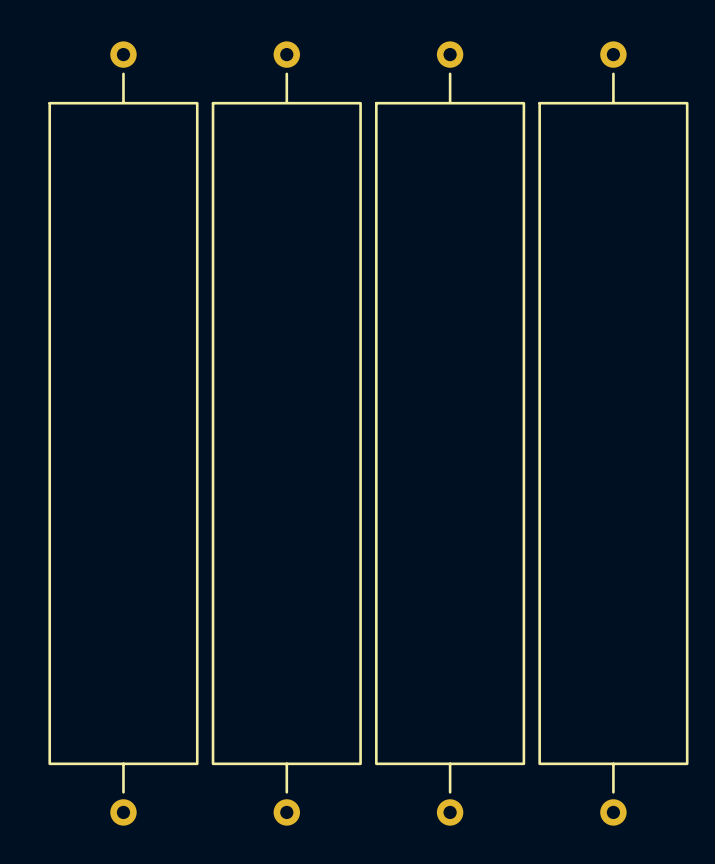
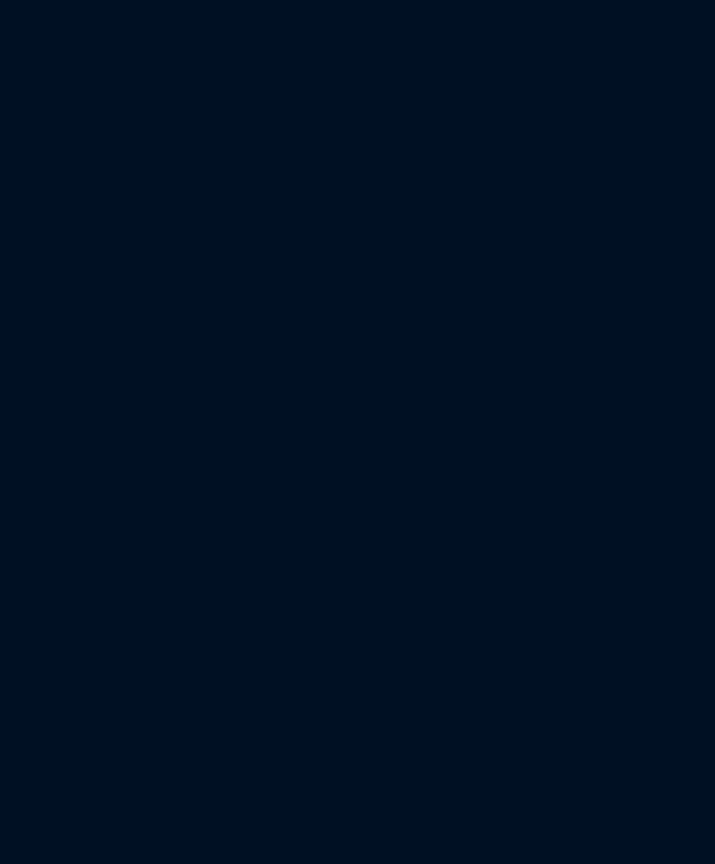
part: (123, 433) -> none
part: (286, 433) -> none
part: (450, 433) -> none
part: (613, 433) -> none

